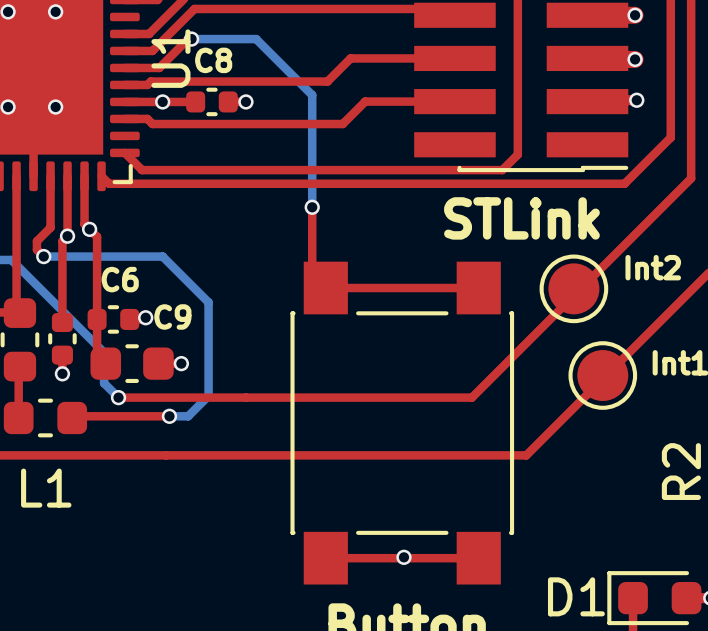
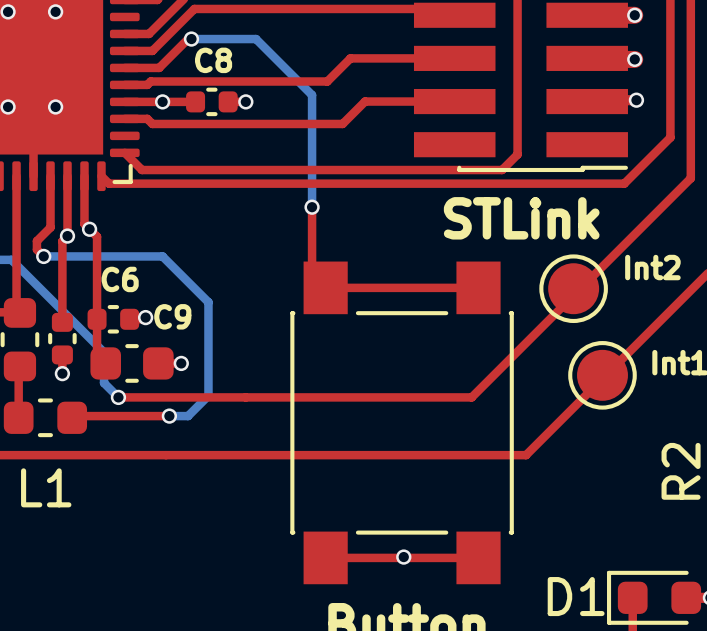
U1 name: U1 (170, 58) -> none

